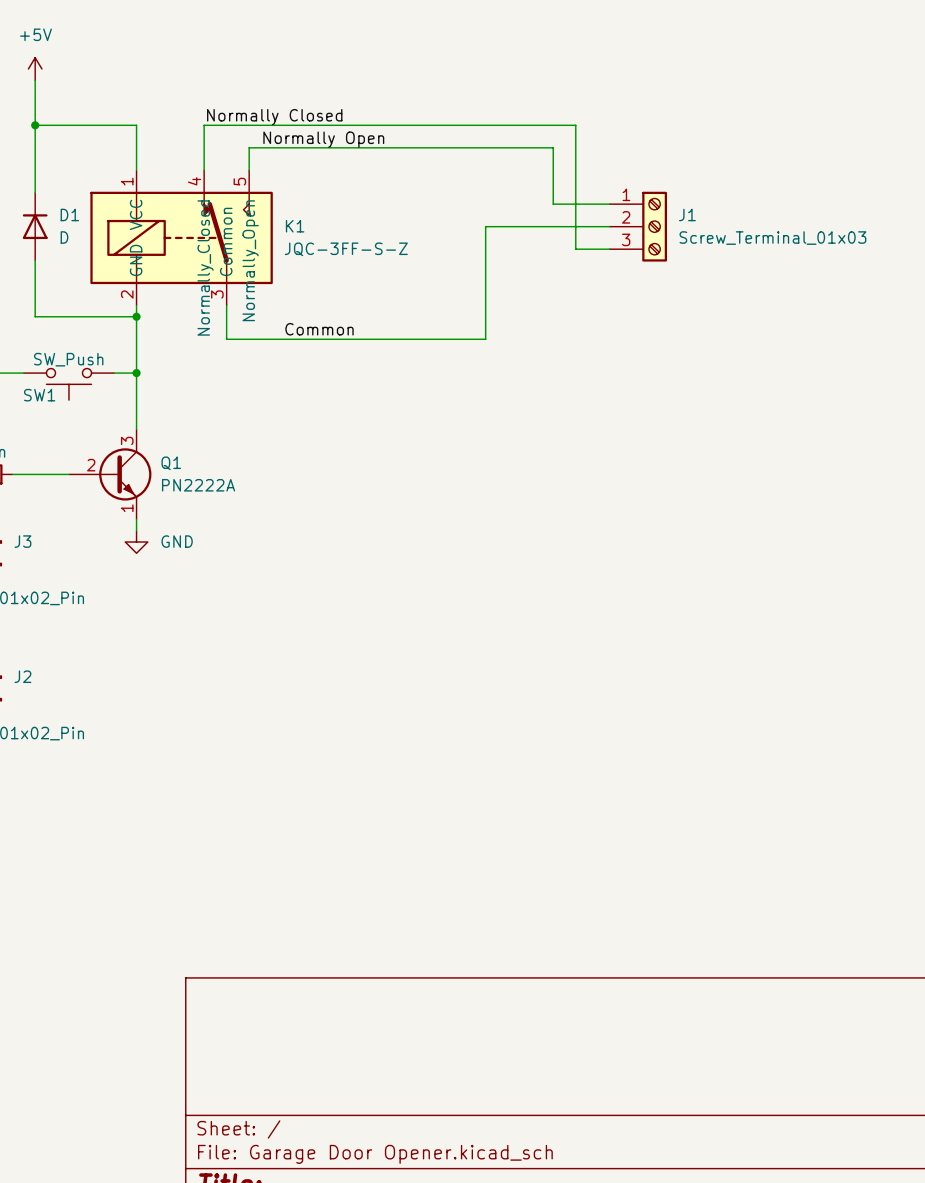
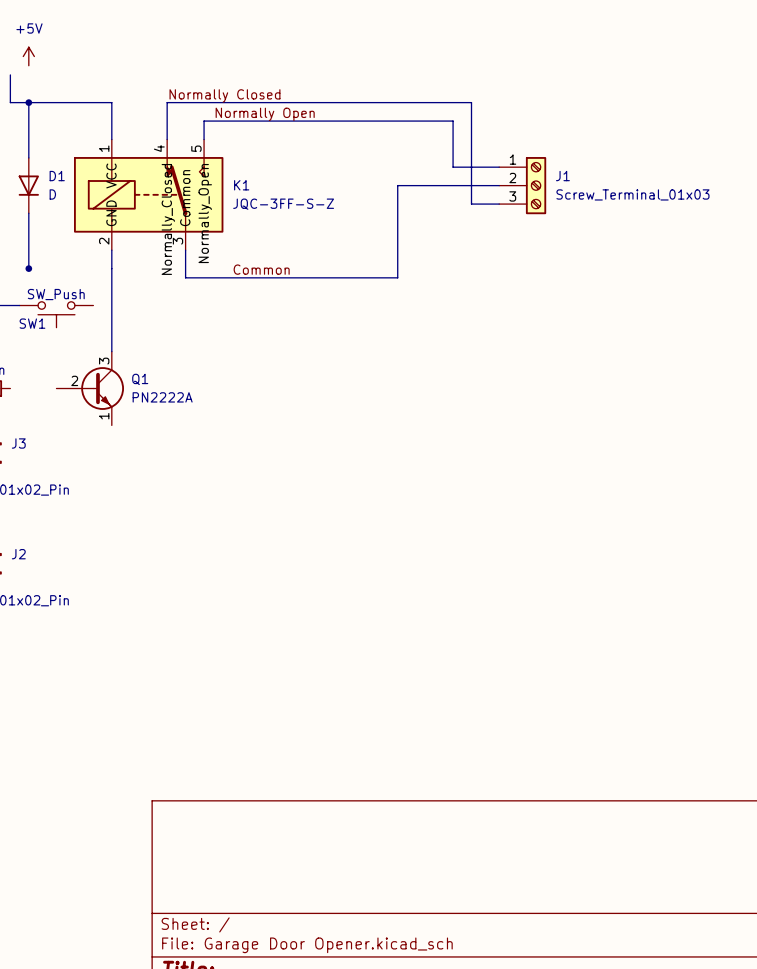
wire: (35, 80) (35, 125) -> (10, 74) (10, 102) (28, 102)
D1 rotation: 0° (35, 226) -> 180° (28, 185)
wire: (35, 316) (136, 316) -> (28, 259) (28, 268)
junction: (136, 316) -> none
junction: none -> (28, 268)
wire: (114, 373) (136, 373) -> none
junction: (136, 373) -> none
wire: (12, 474) (68, 474) -> none
wire: (136, 519) (136, 530) -> none
power symbol: GND (136, 542) -> none

